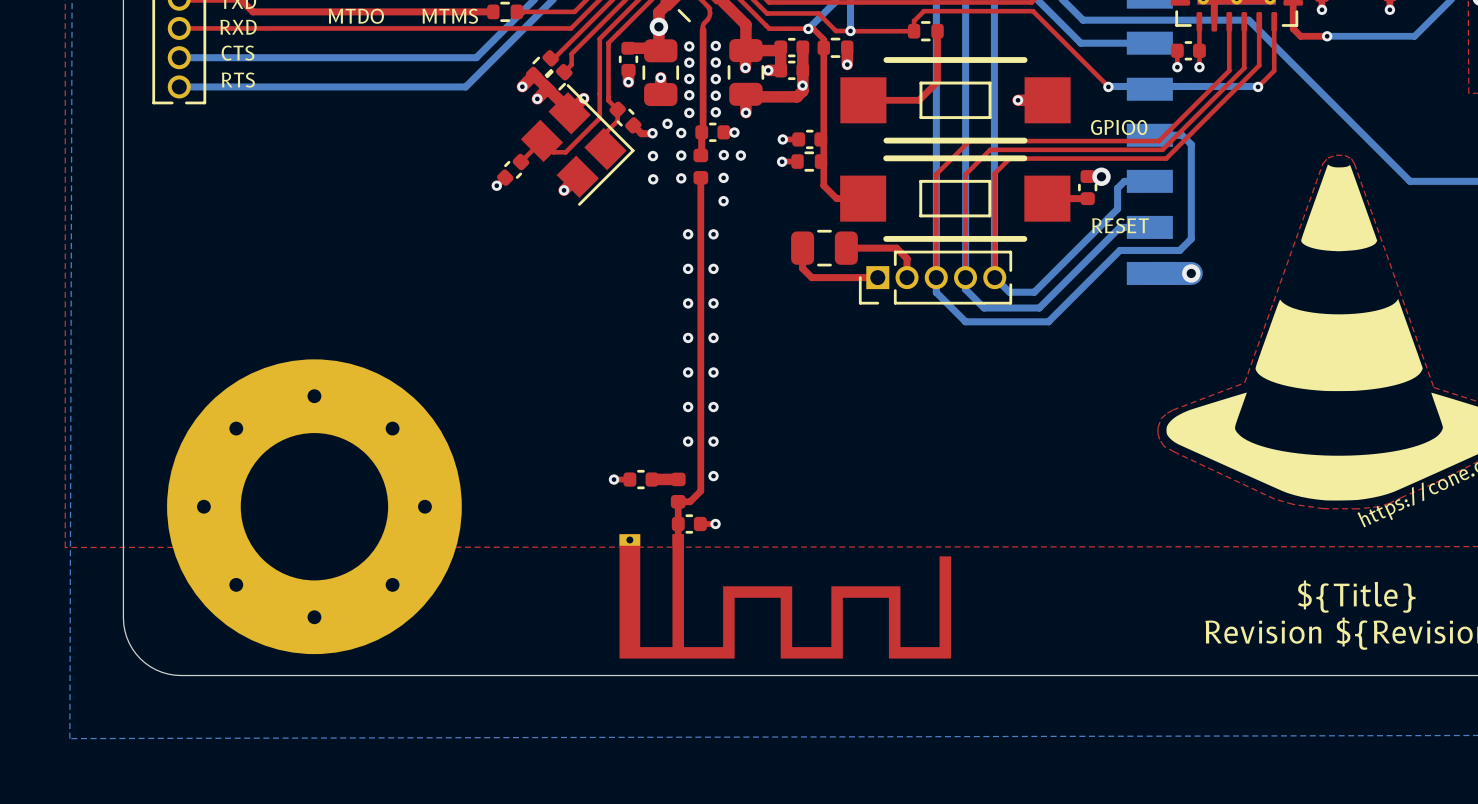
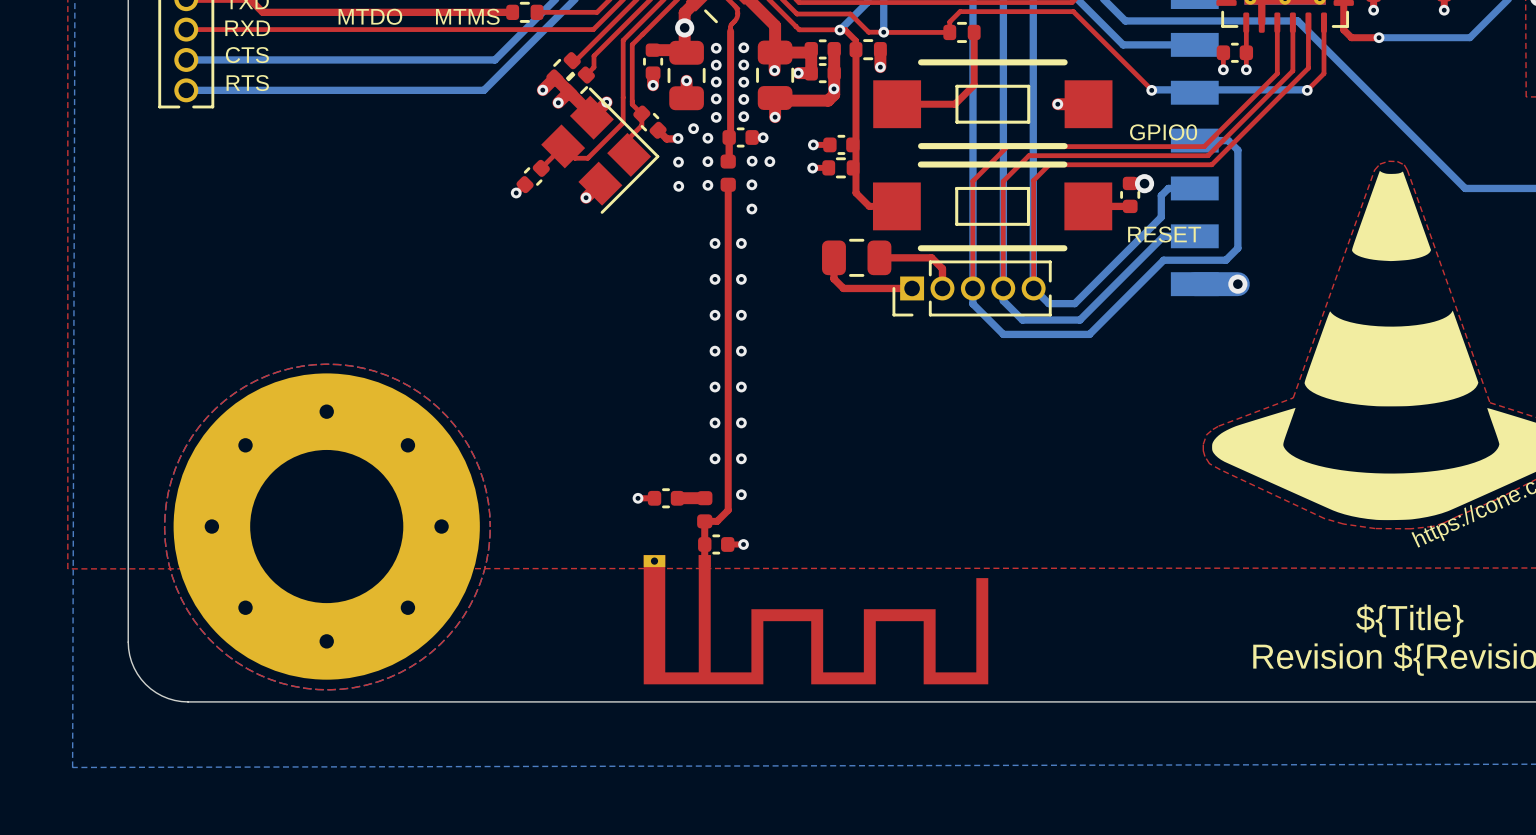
top zone outline: none -> (326, 364) (362, 368) (386, 375) (418, 392) (446, 415) (461, 435) (478, 467) (488, 502) (490, 527) (486, 560) (475, 594) (463, 616) (440, 644) (421, 659) (389, 677) (366, 685) (330, 689) (293, 686) (270, 679) (237, 662) (209, 639) (187, 610) (176, 588) (166, 553) (164, 528) (166, 504) (175, 468) (192, 436) (215, 408) (245, 386) (266, 375) (302, 366) (326, 364)

